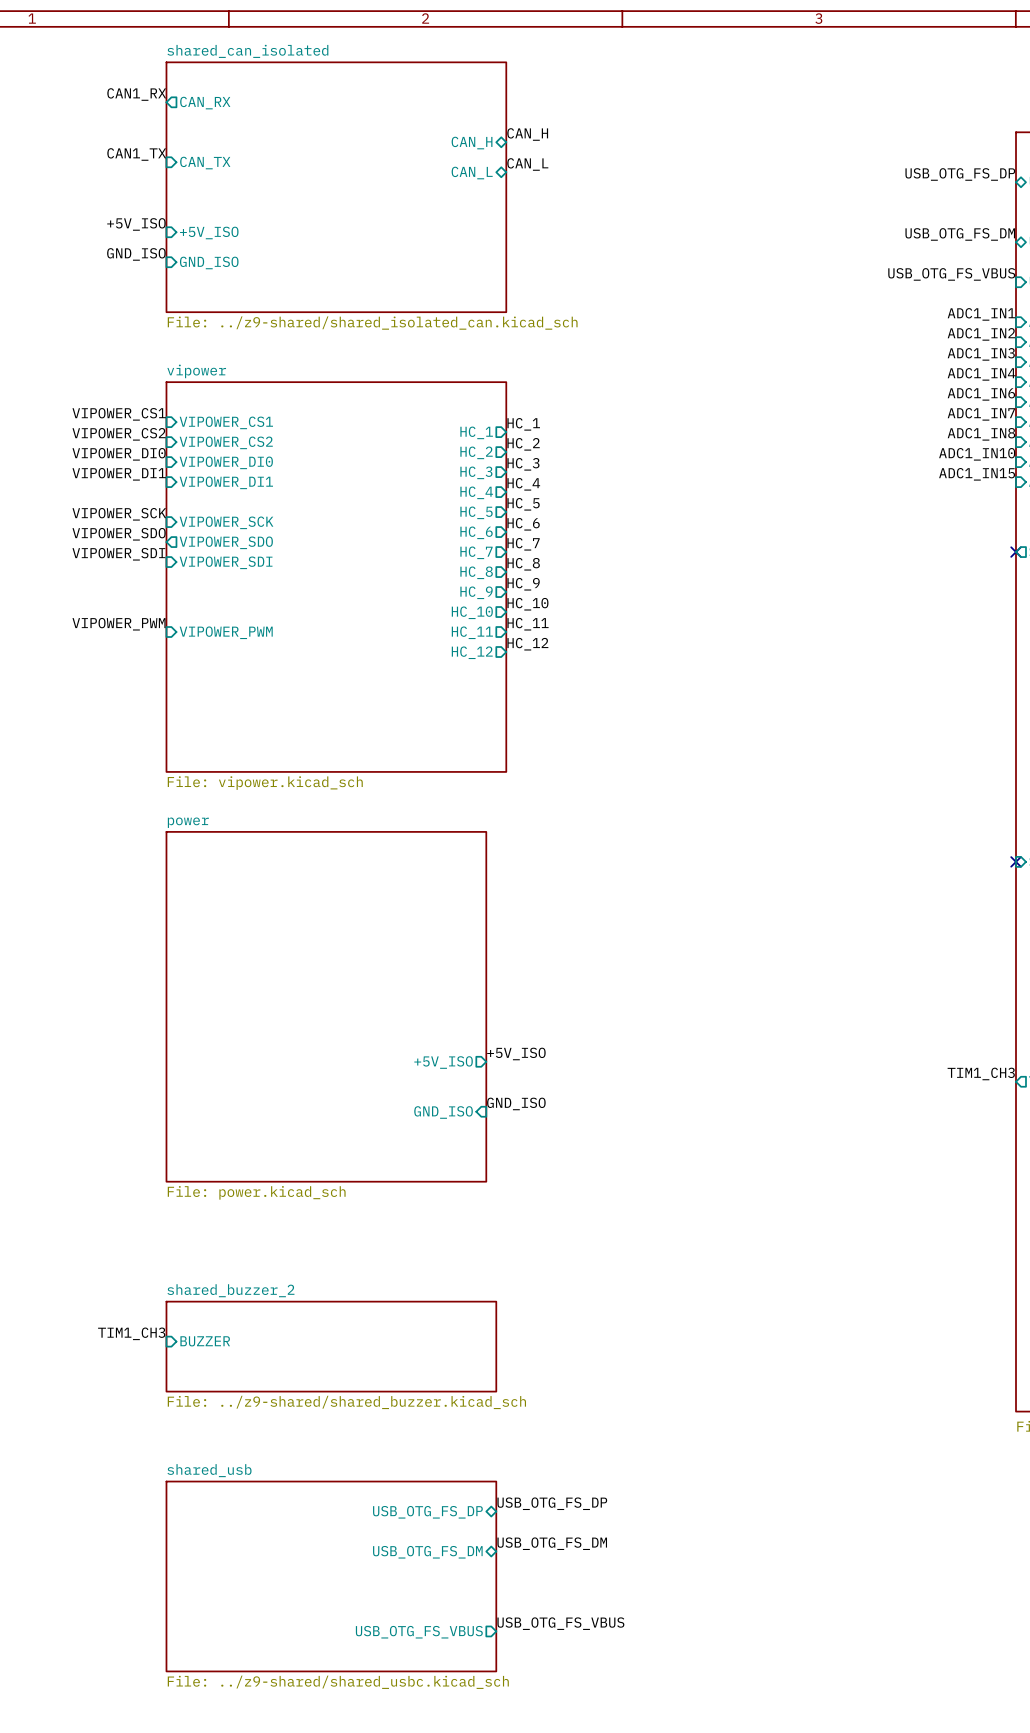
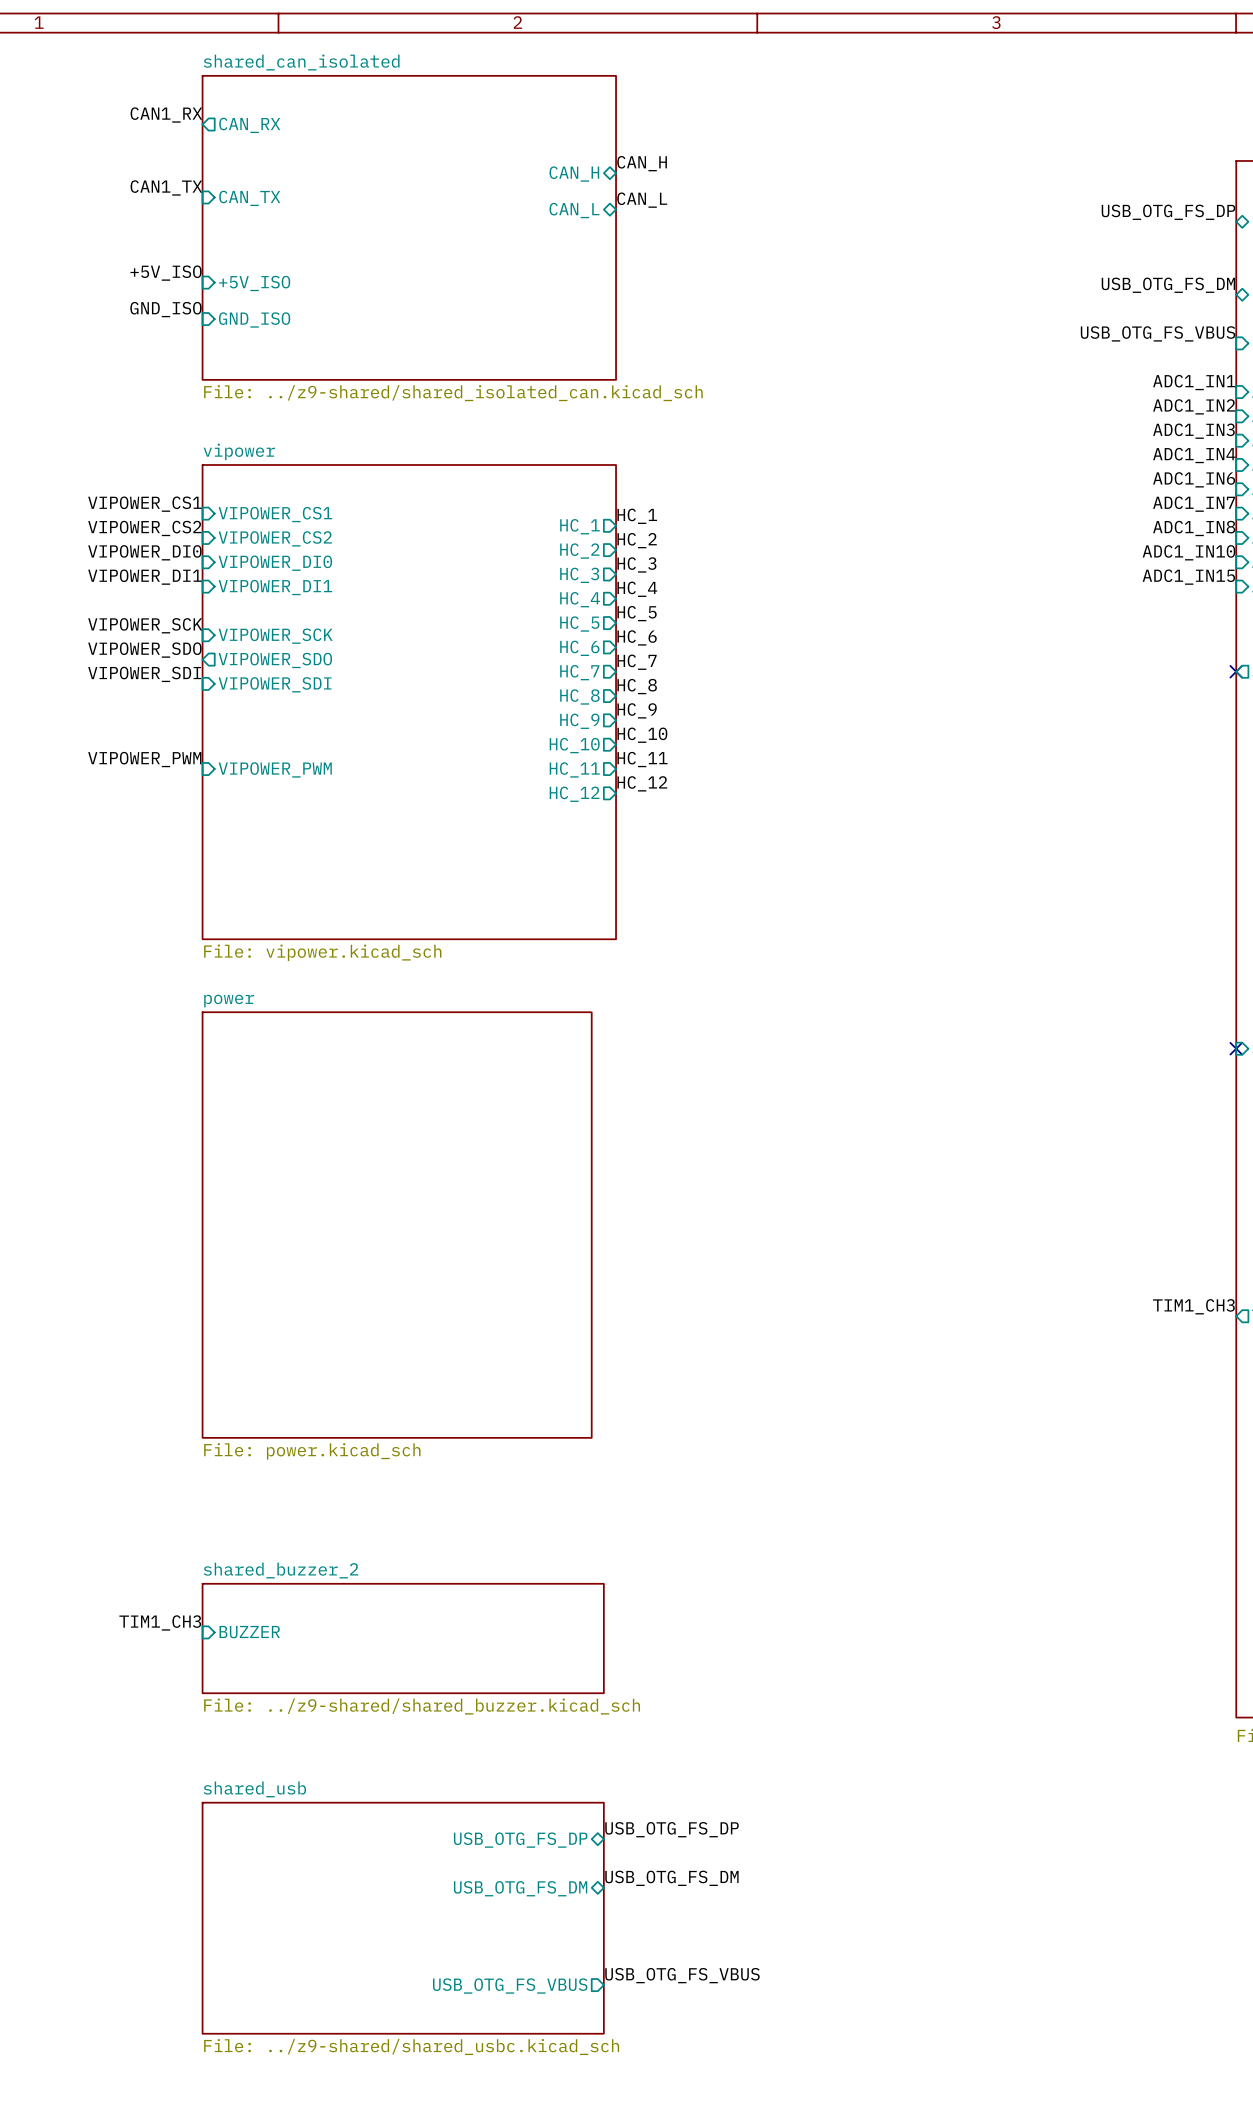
label: +5V_ISO (516, 1053) -> none
sheet pin: +5V_ISO (443, 1062) -> none
label: GND_ISO (516, 1103) -> none
sheet pin: GND_ISO (443, 1112) -> none

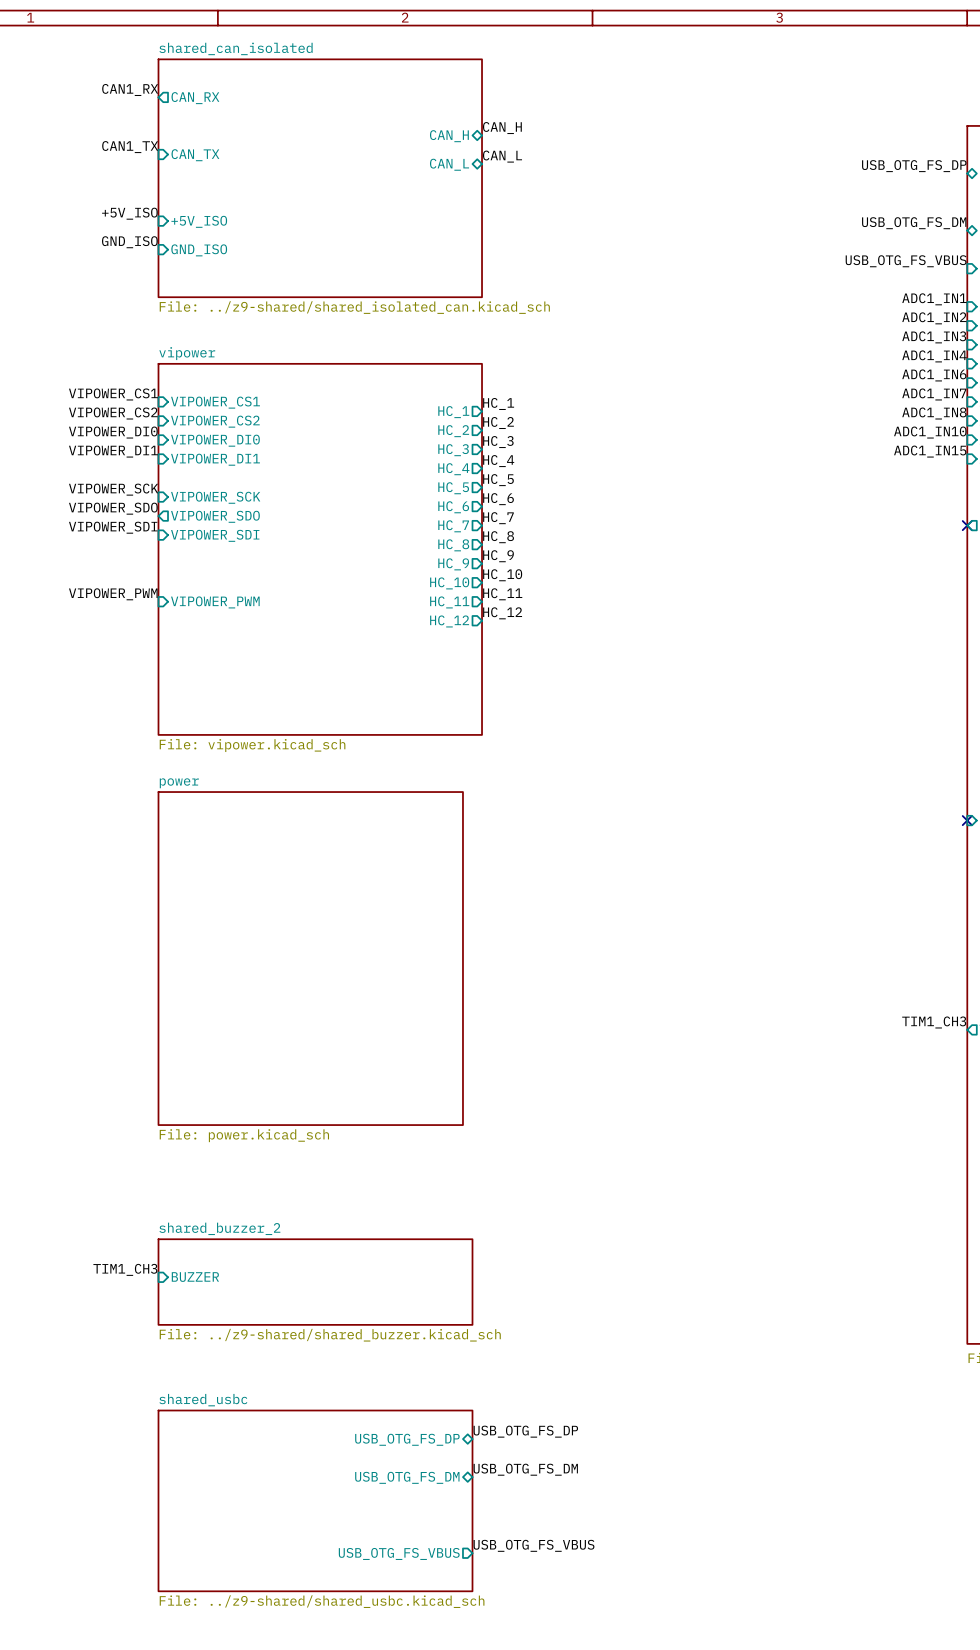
sheet shared_usb name: shared_usb (254, 1789) -> shared_usbc (203, 1400)

